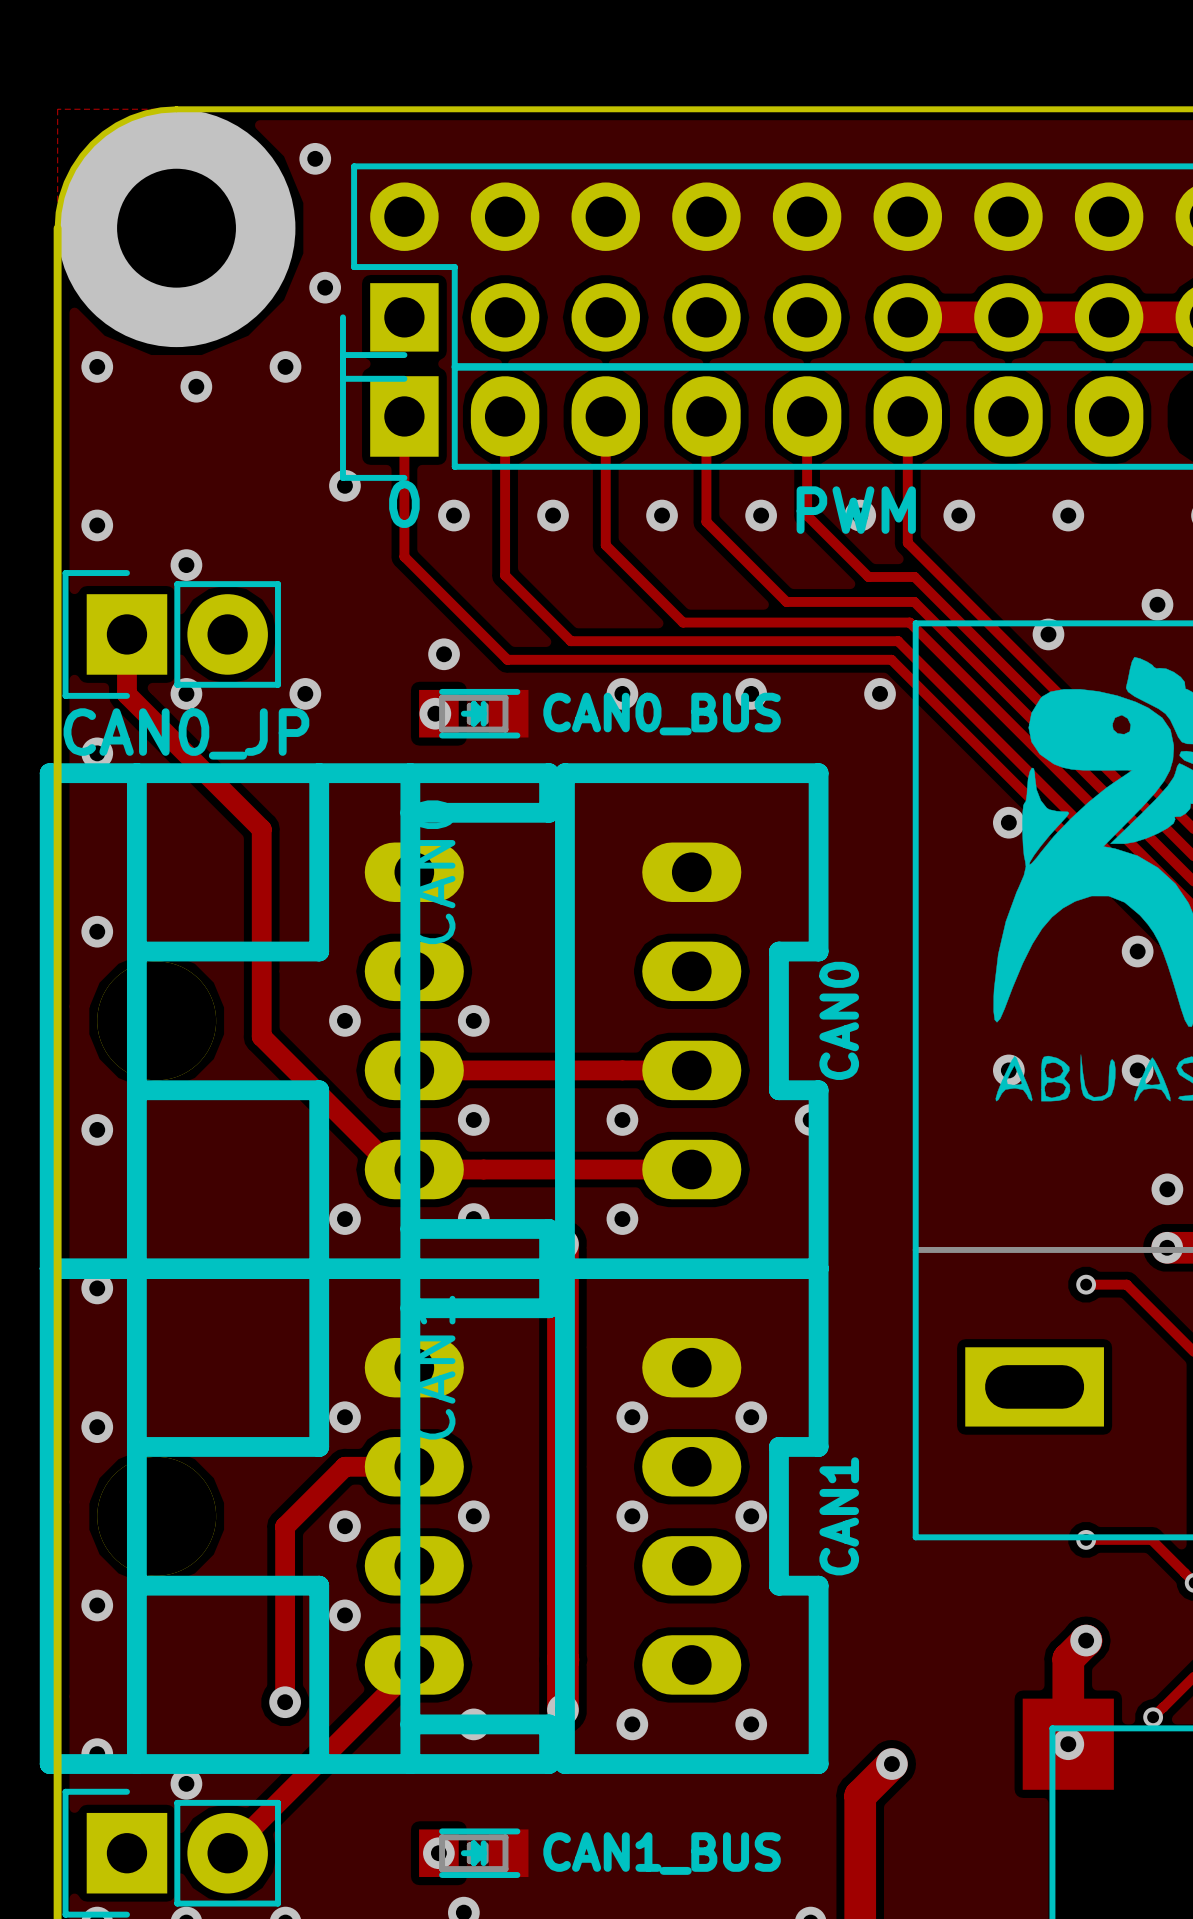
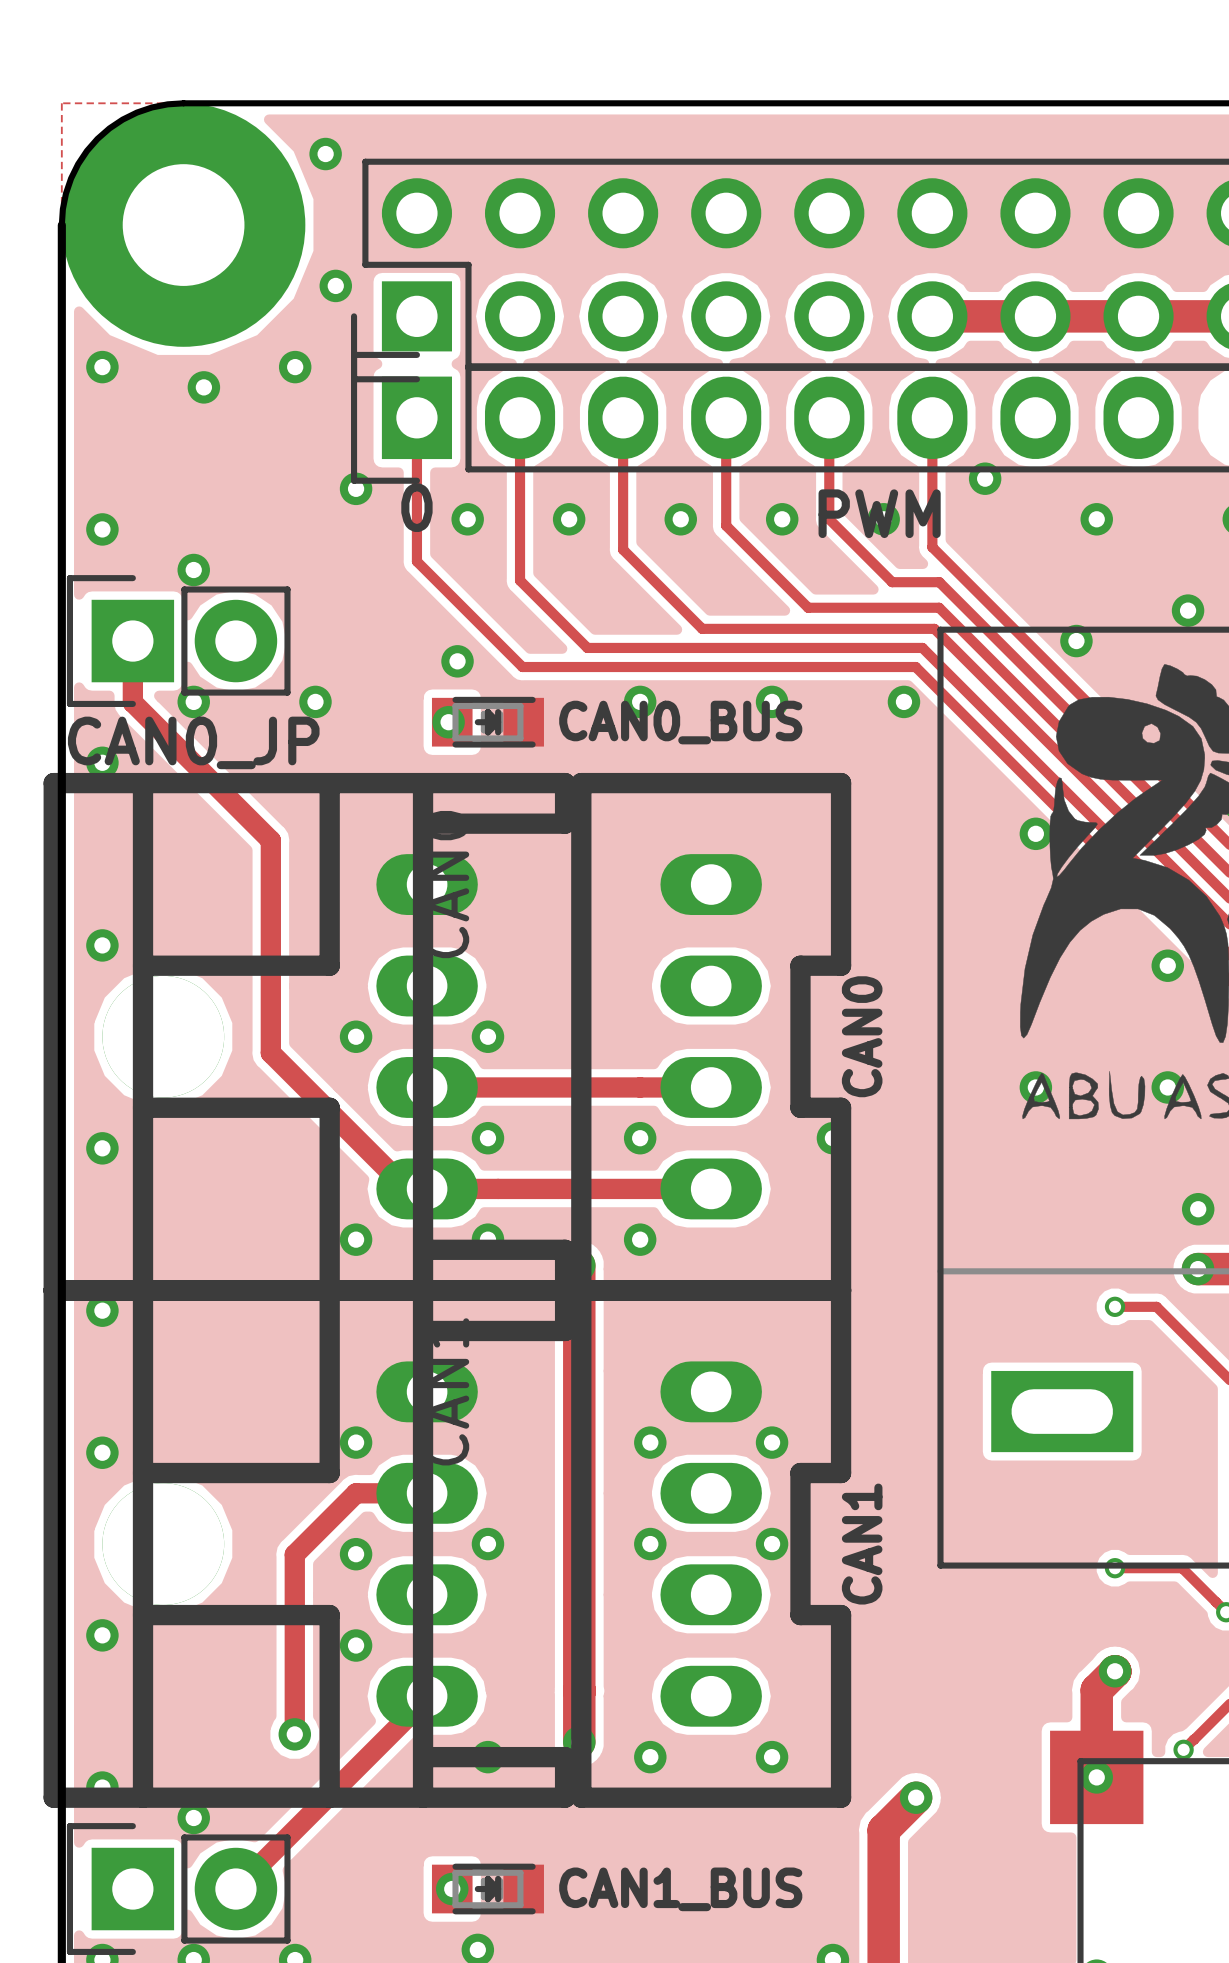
via position: (959, 515) -> (985, 478)

